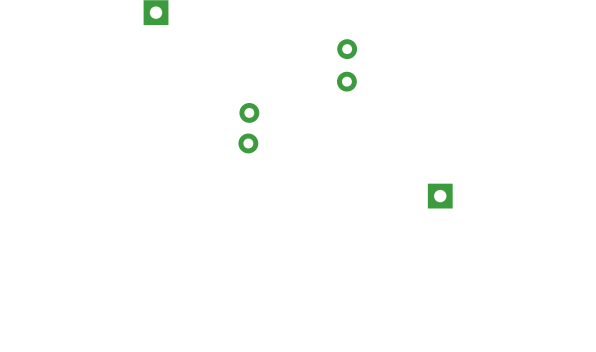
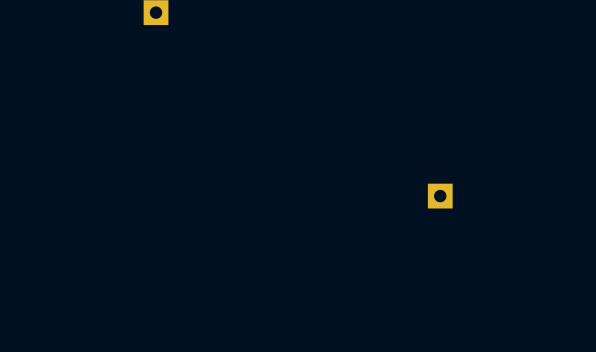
via: (347, 49) -> none
via: (346, 81) -> none
via: (249, 112) -> none
via: (248, 143) -> none

